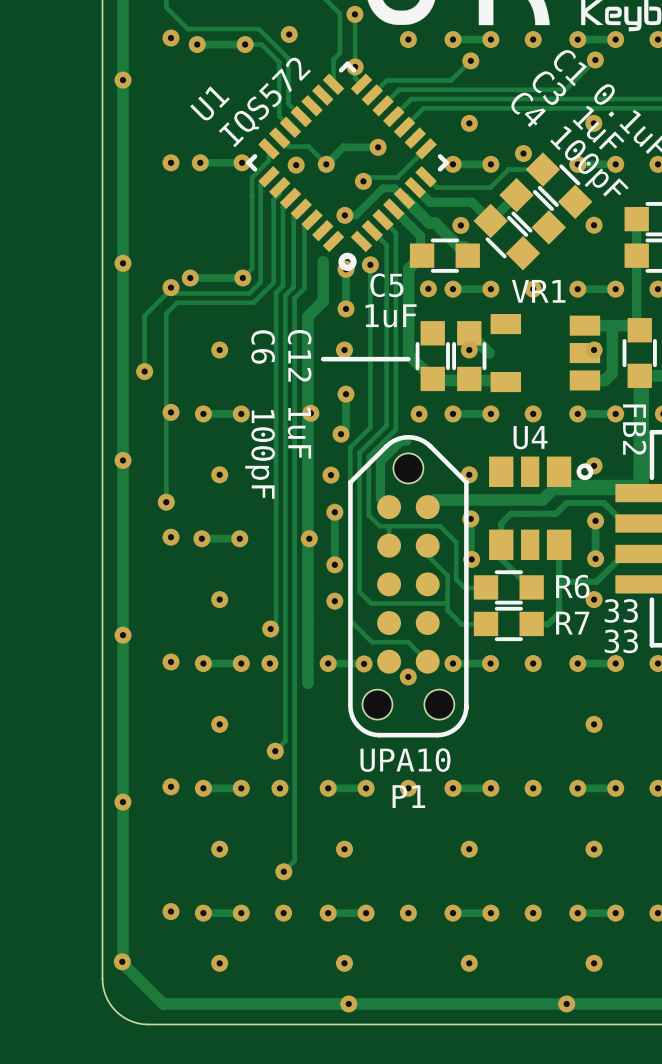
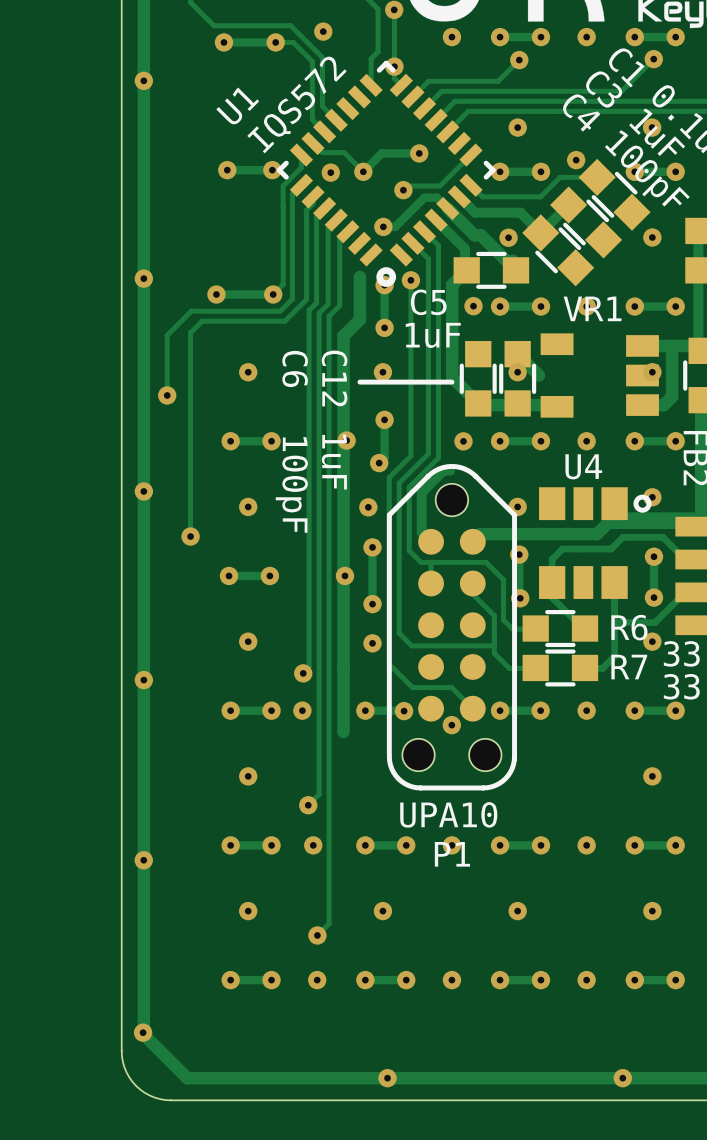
via: (170, 38) -> none
via: (170, 162) -> none
via: (170, 287) -> none
via: (170, 412) -> none
via: (170, 537) -> none
via: (170, 662) -> none
via: (170, 786) -> none
via: (170, 911) -> none
via: (219, 963) -> none
via: (344, 963) -> none
via: (469, 963) -> none
via: (594, 963) -> none

